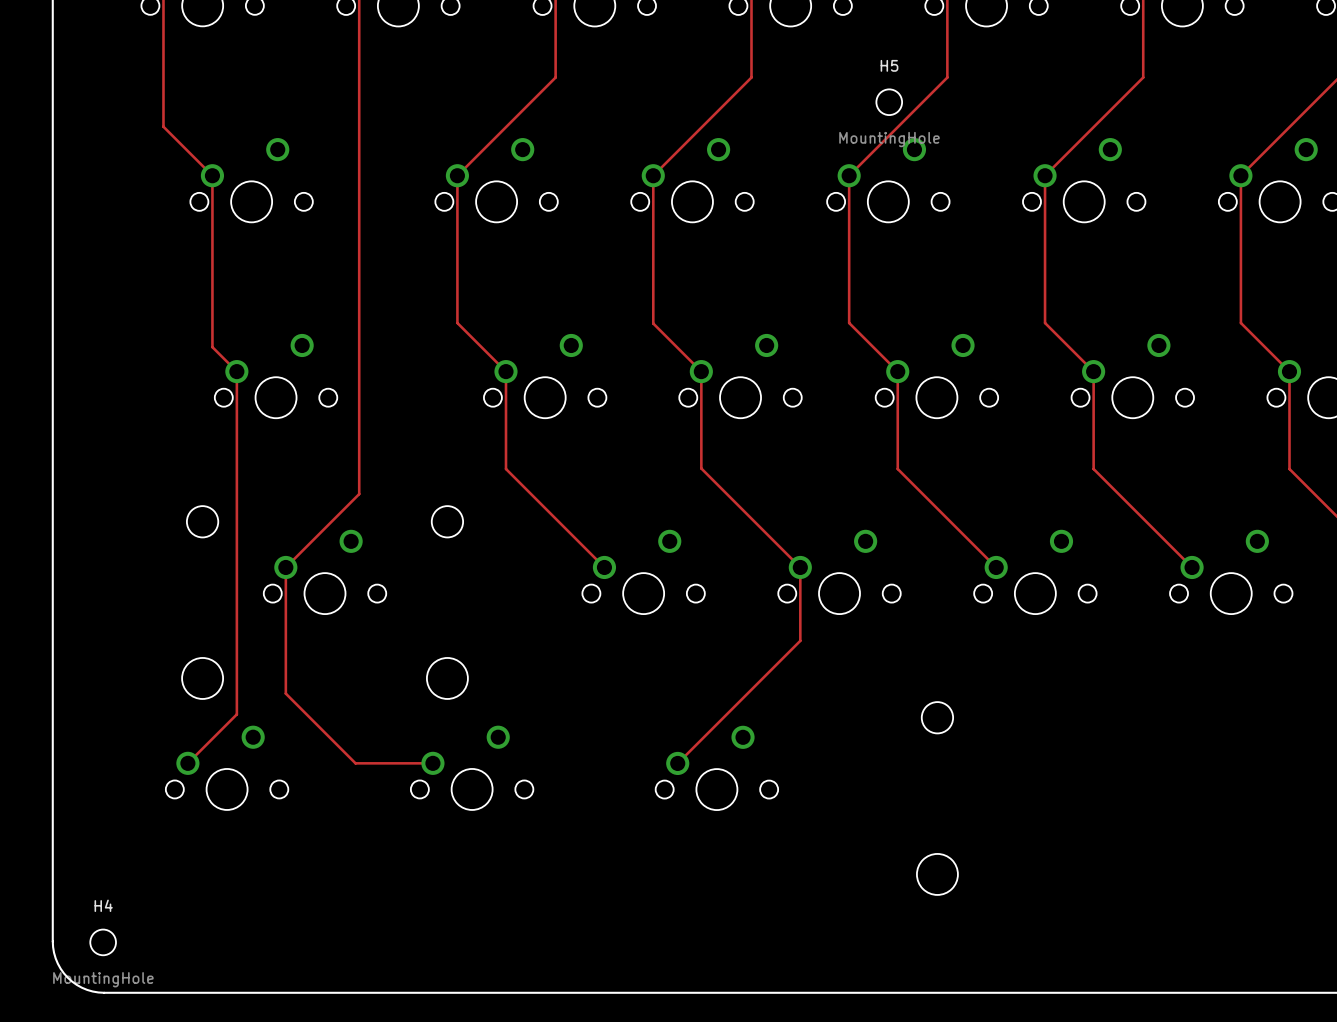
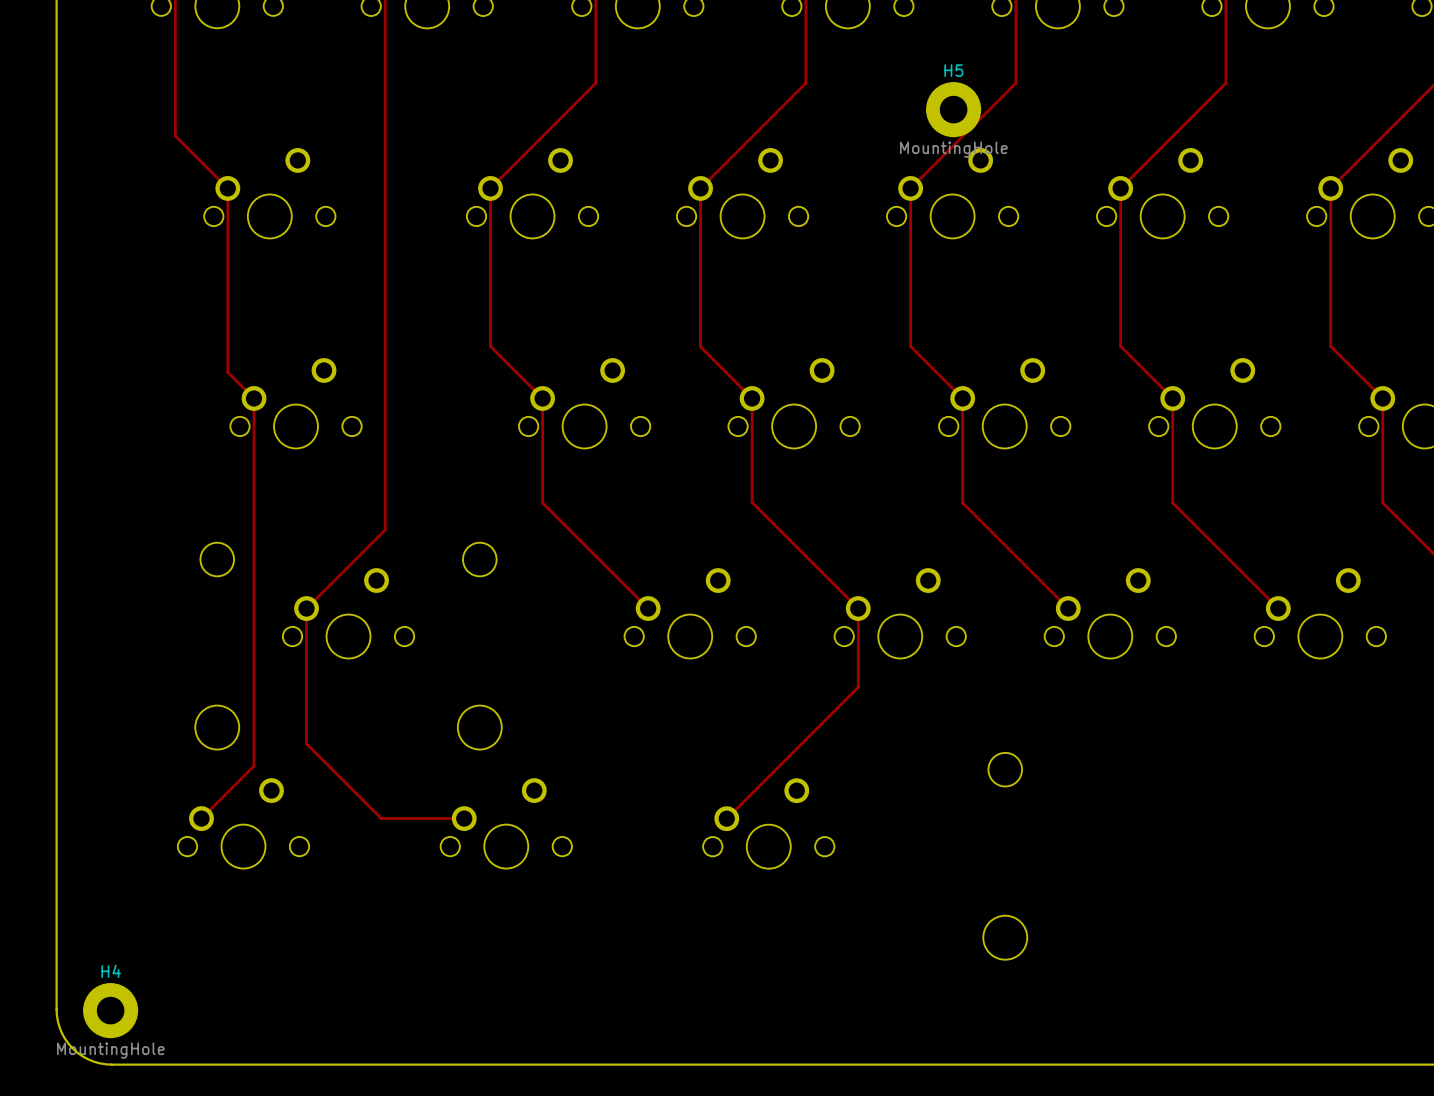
H5 footprint: [876, 89, 903, 116] -> [926, 82, 982, 138]
H4 footprint: [90, 929, 117, 956] -> [83, 983, 139, 1039]

